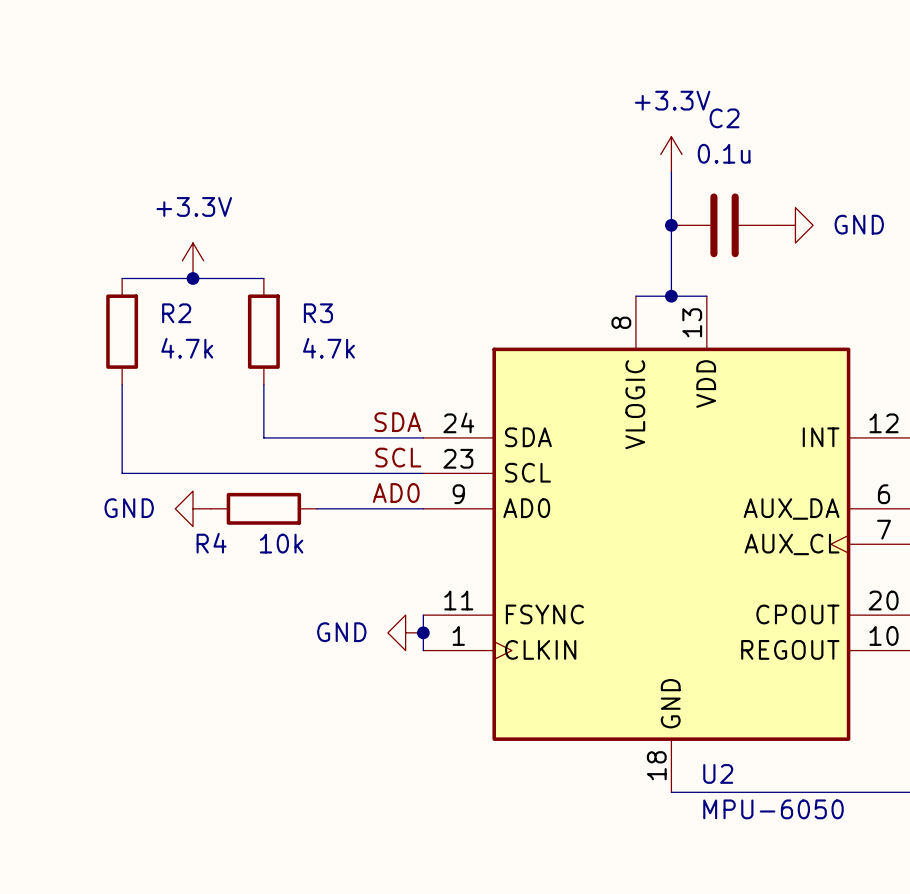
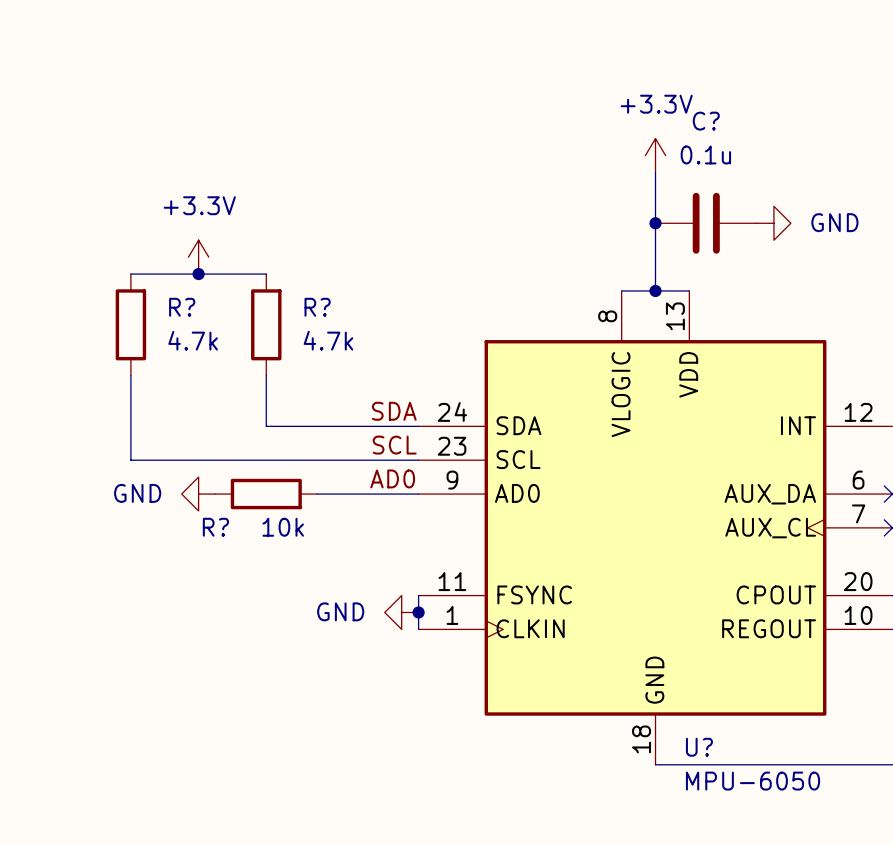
C2 name: C2 (724, 118) -> C? (706, 121)
R2 name: R2 (176, 313) -> R? (182, 307)
R3 name: R3 (318, 313) -> R? (317, 307)
R4 name: R4 (211, 543) -> R? (215, 527)
U2 name: U2 (718, 773) -> U? (699, 747)

